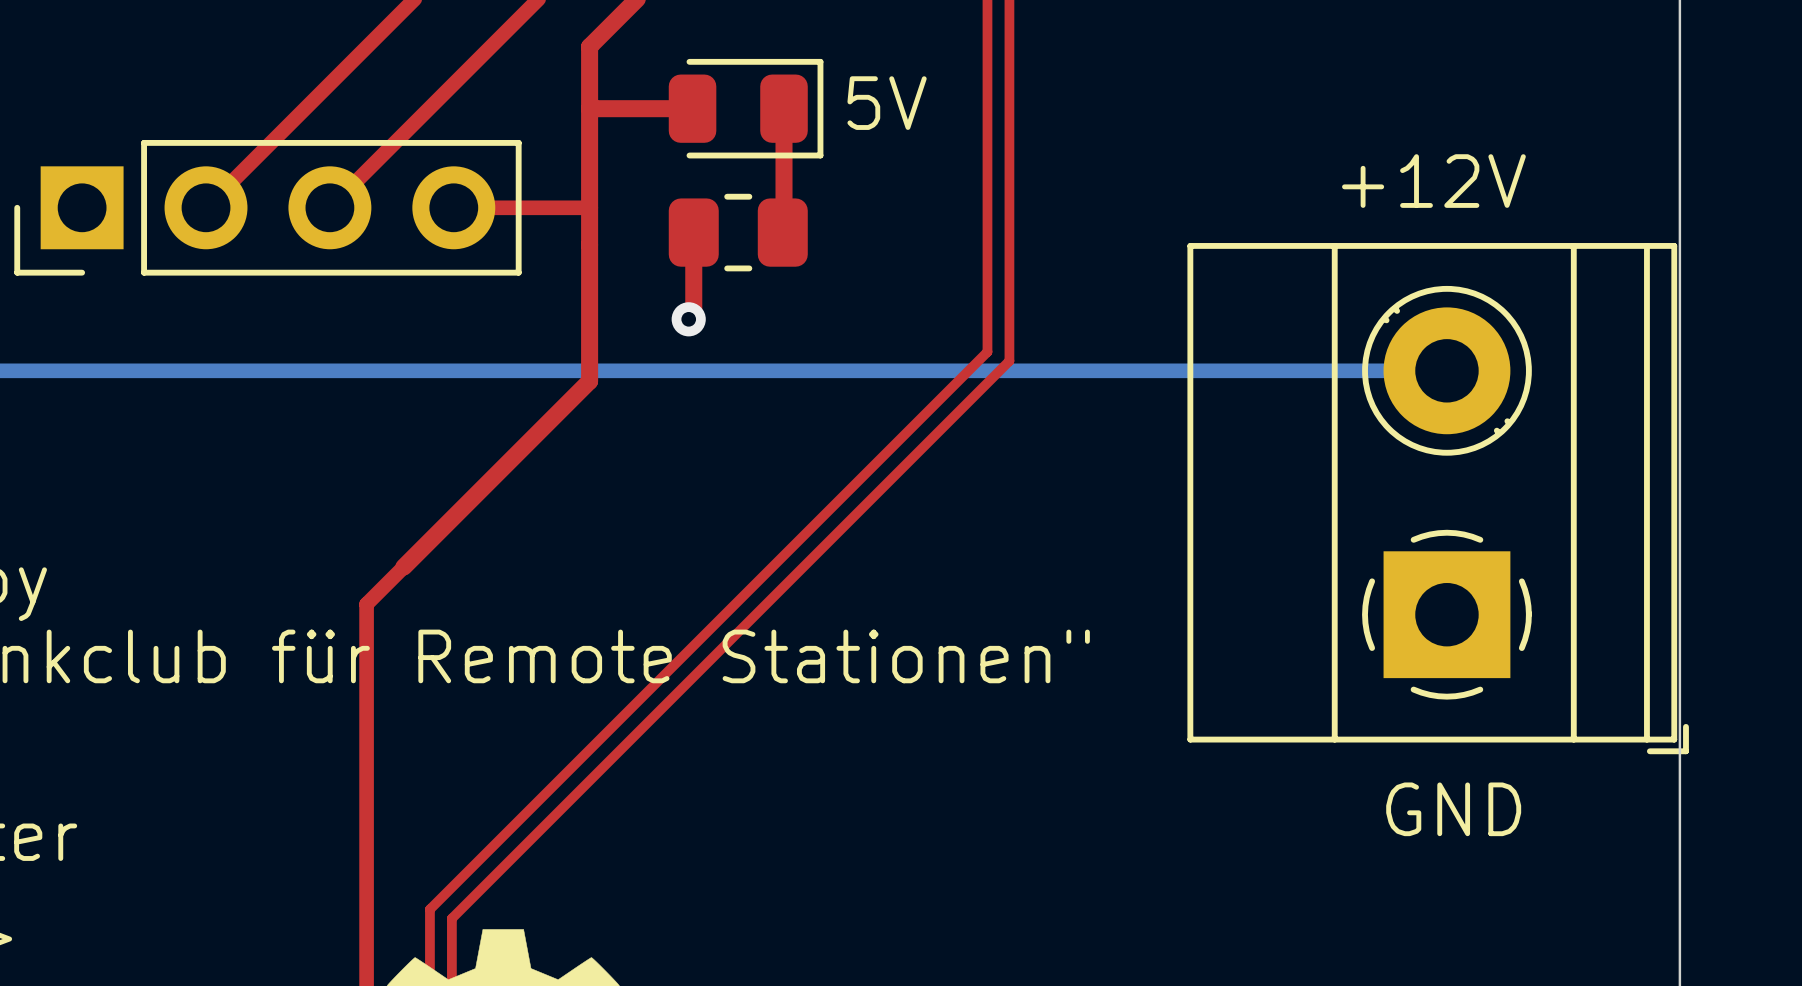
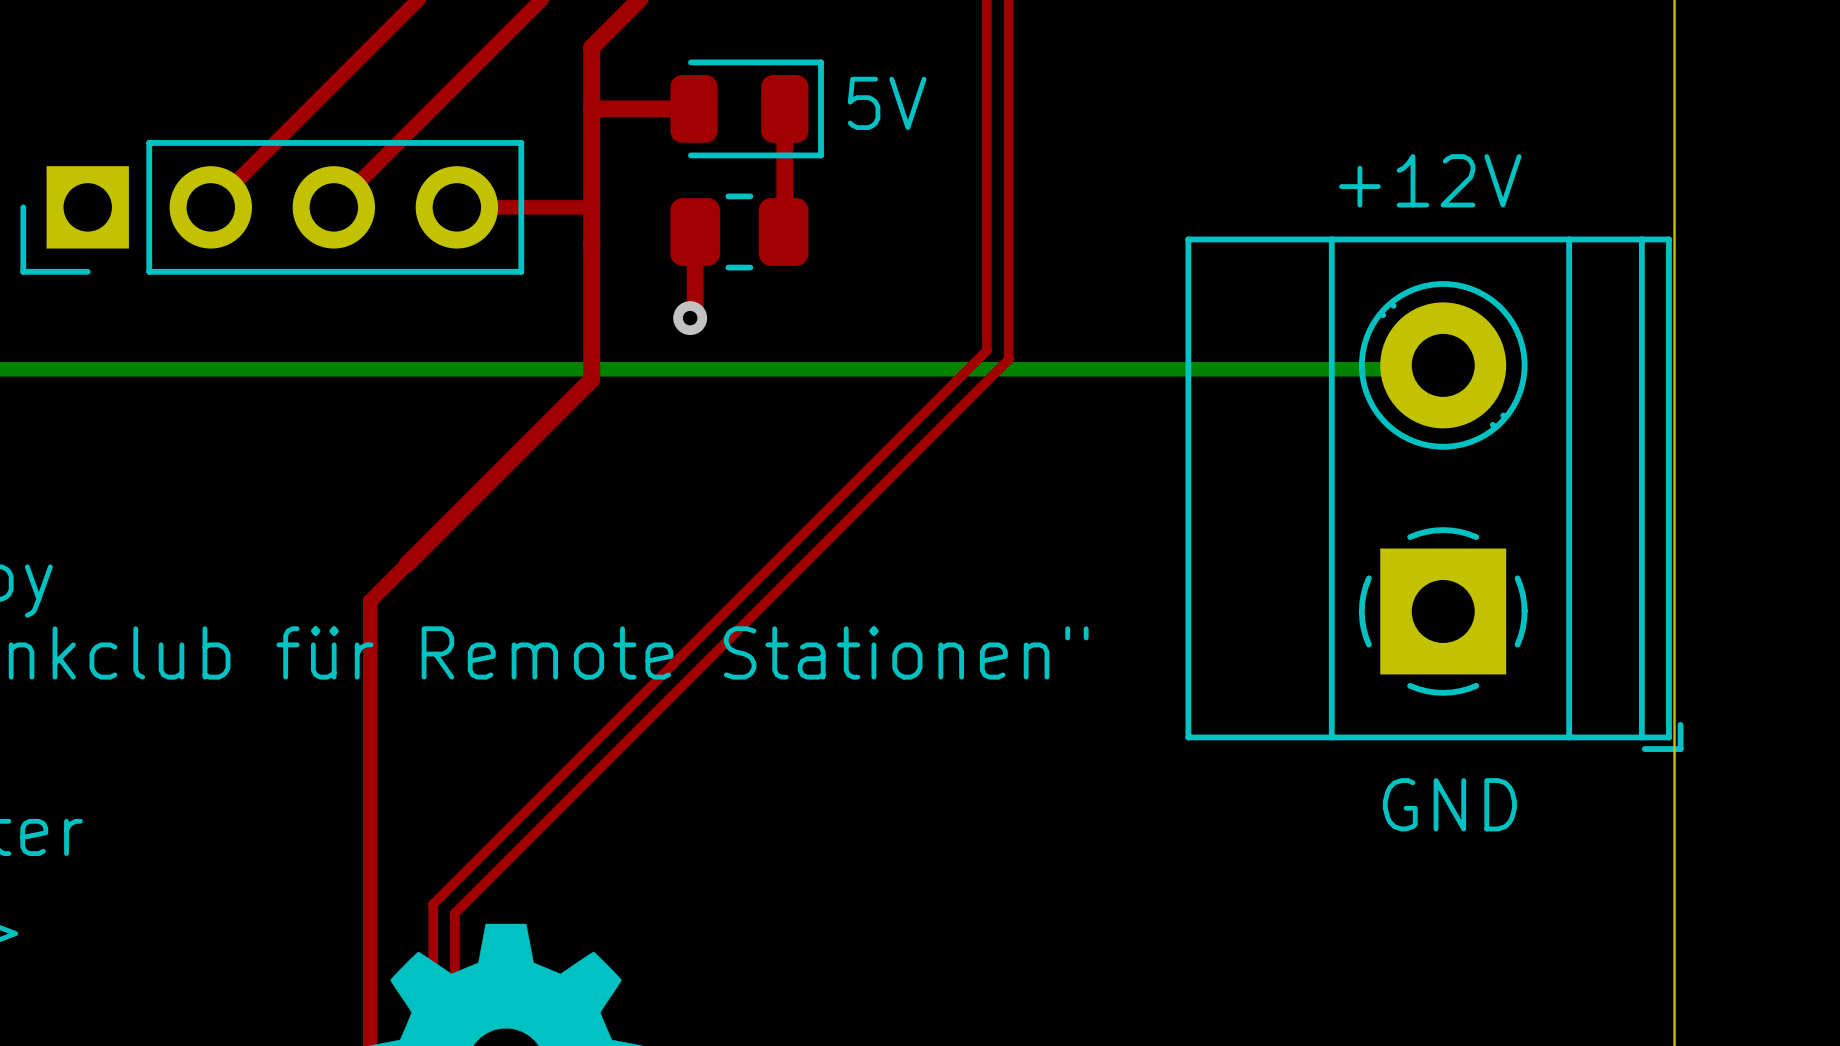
part footprint: [1187, 243, 1689, 755] -> [1185, 236, 1684, 752]

